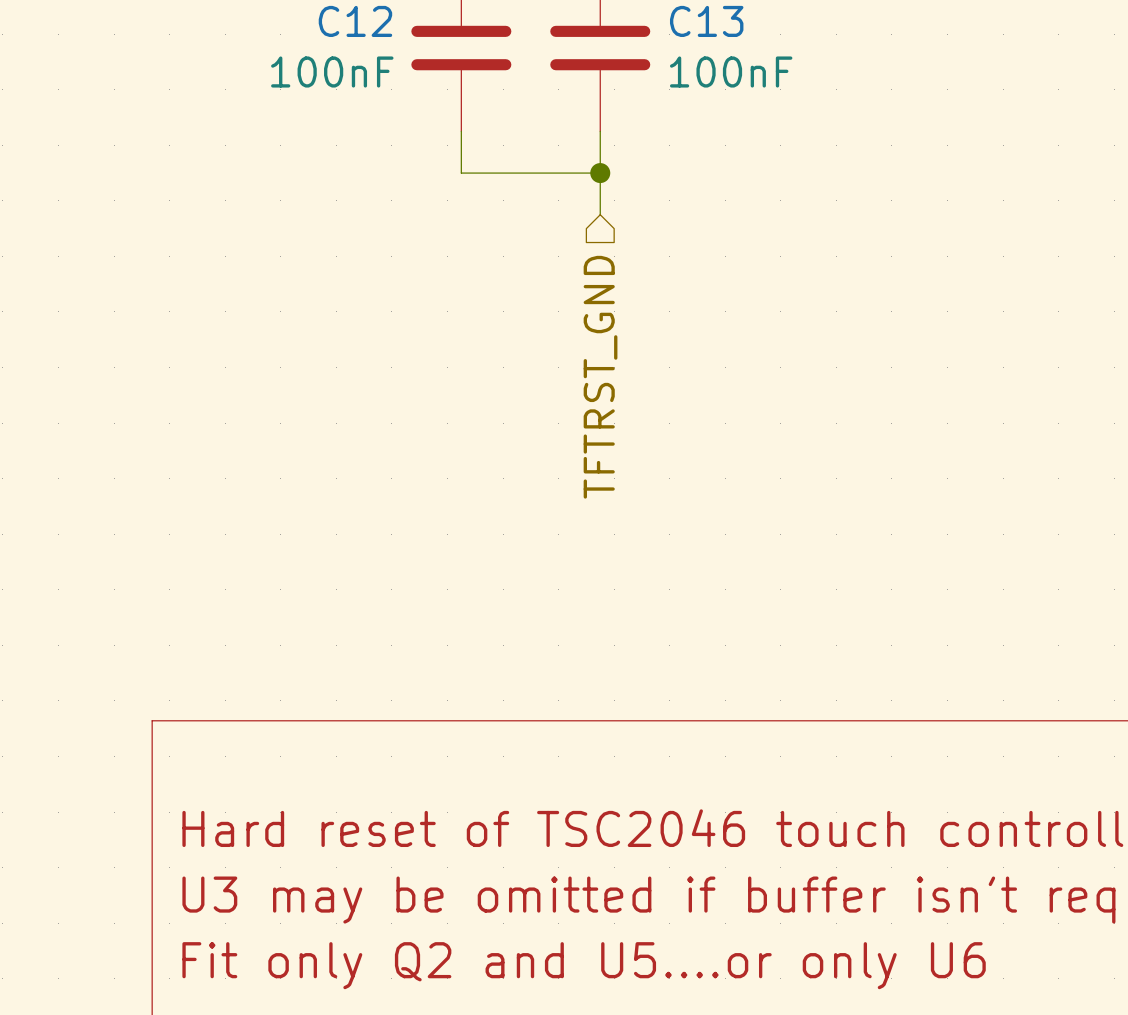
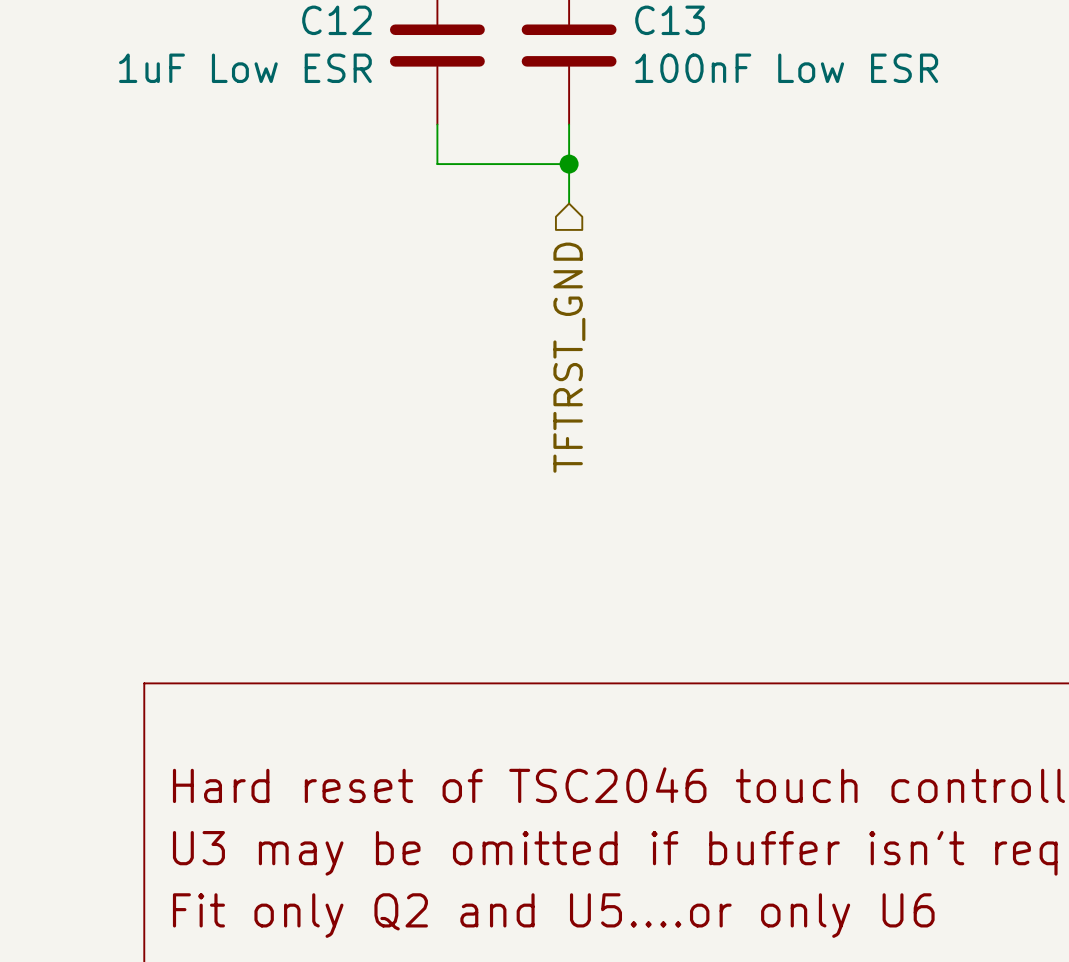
C12 value: 100nF (332, 72) -> 1uF Low ESR (245, 68)
C13 value: 100nF (731, 72) -> 100nF Low ESR (786, 68)

